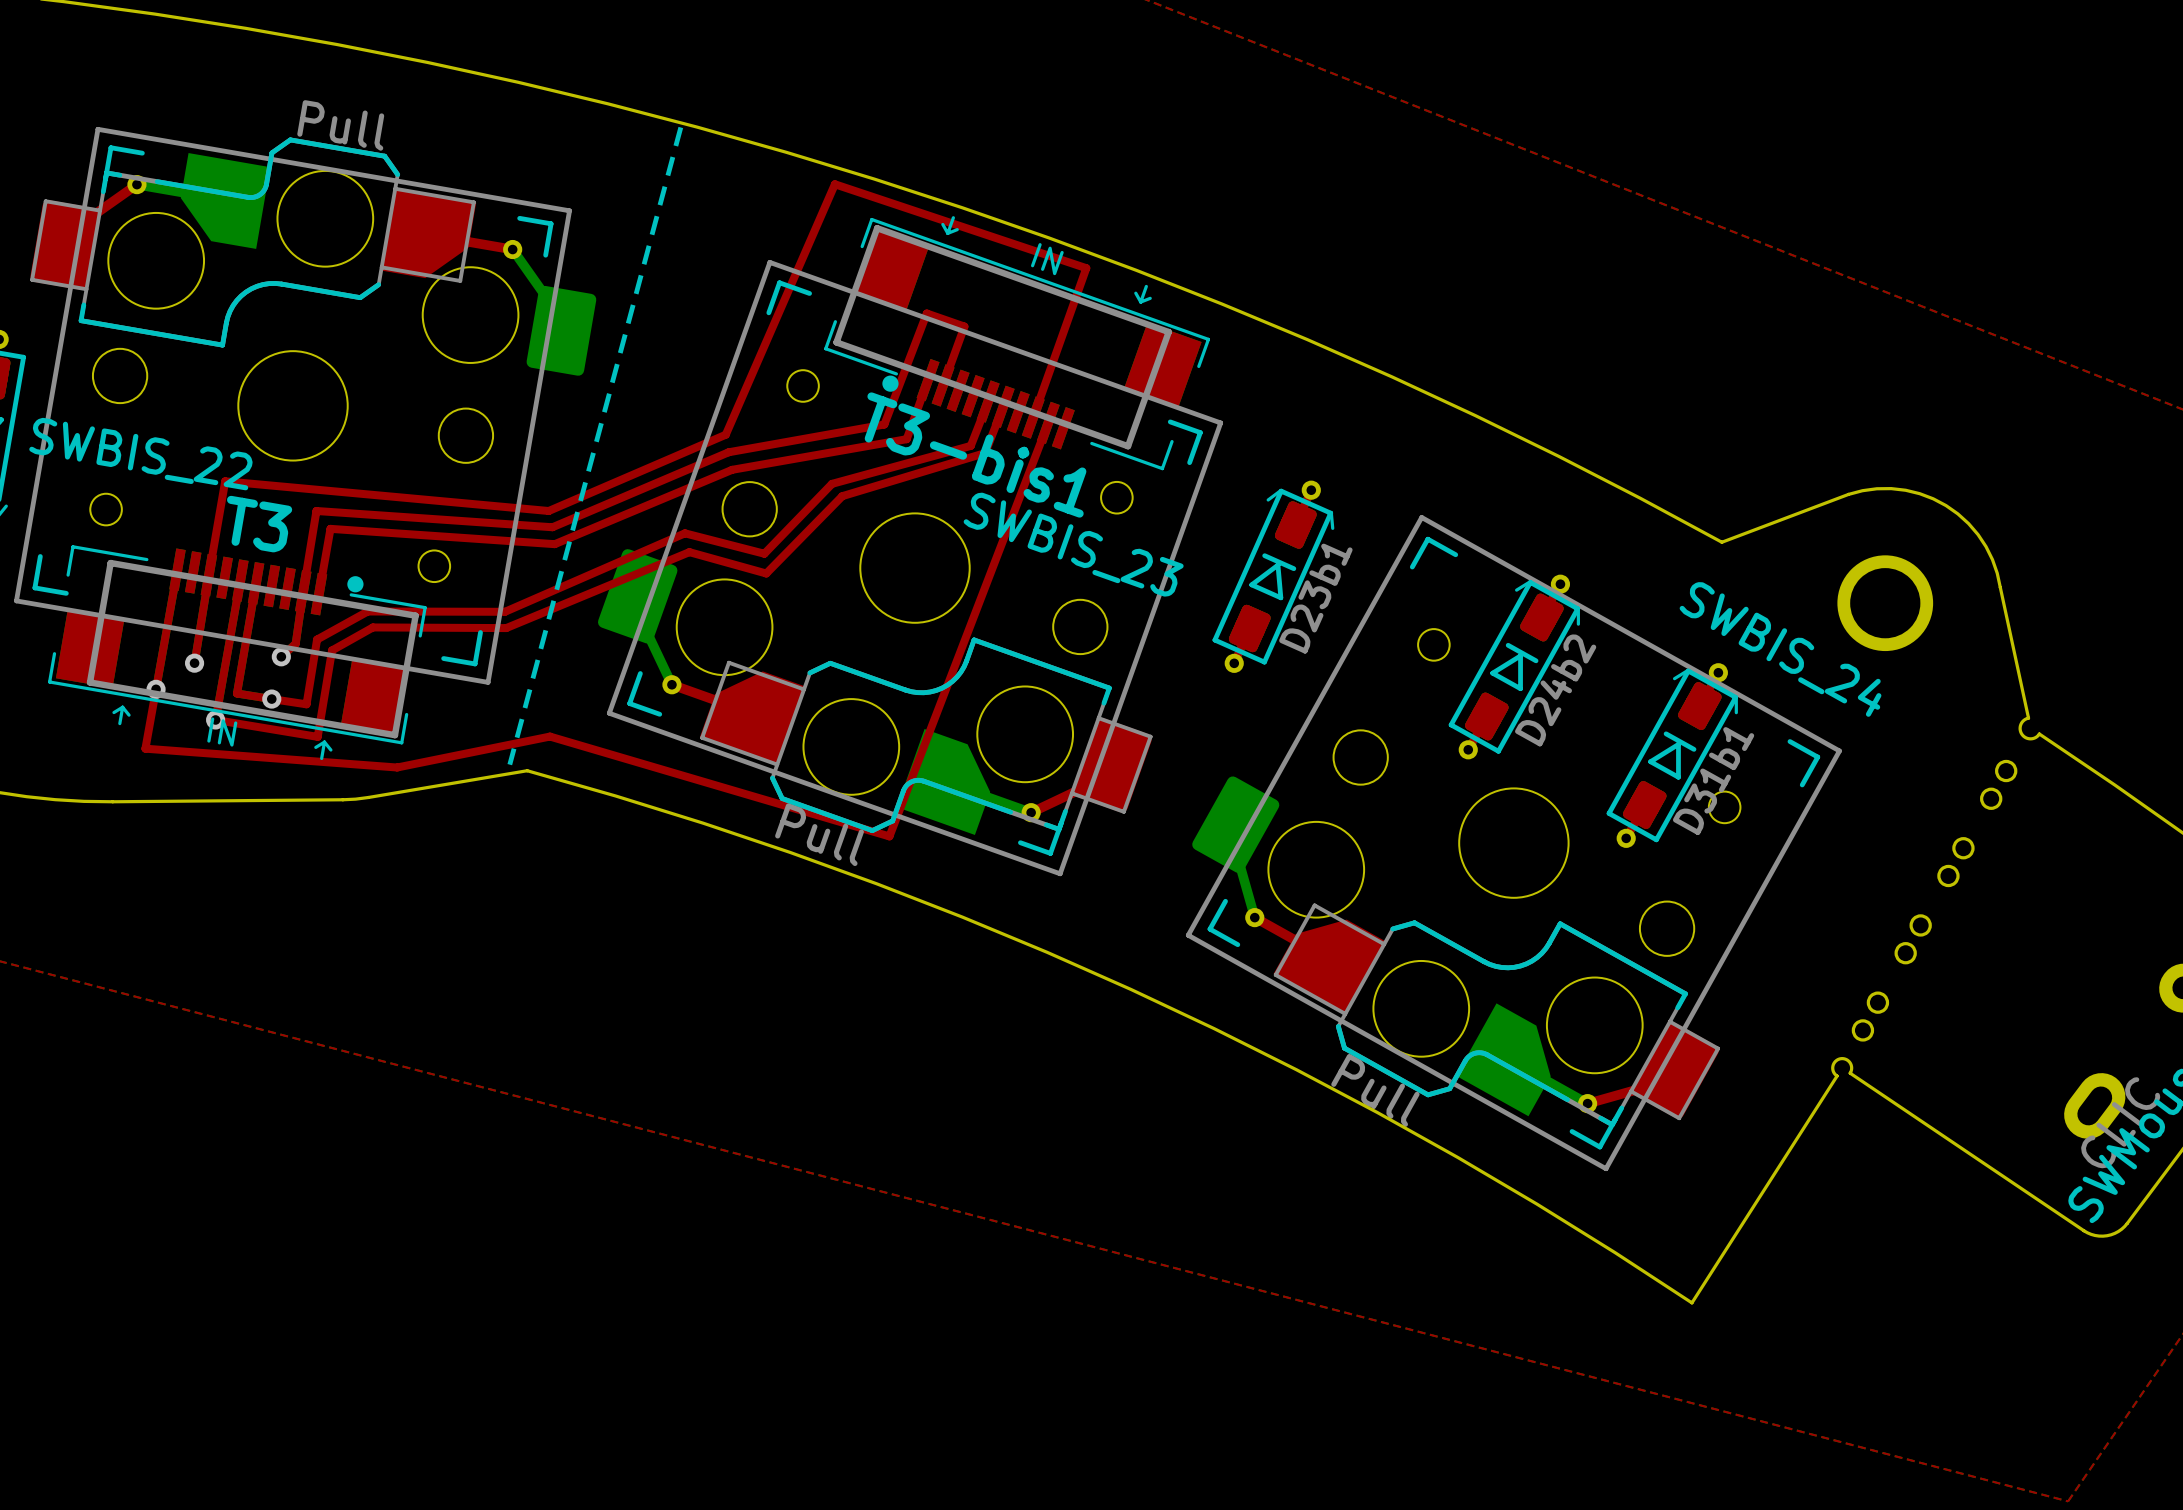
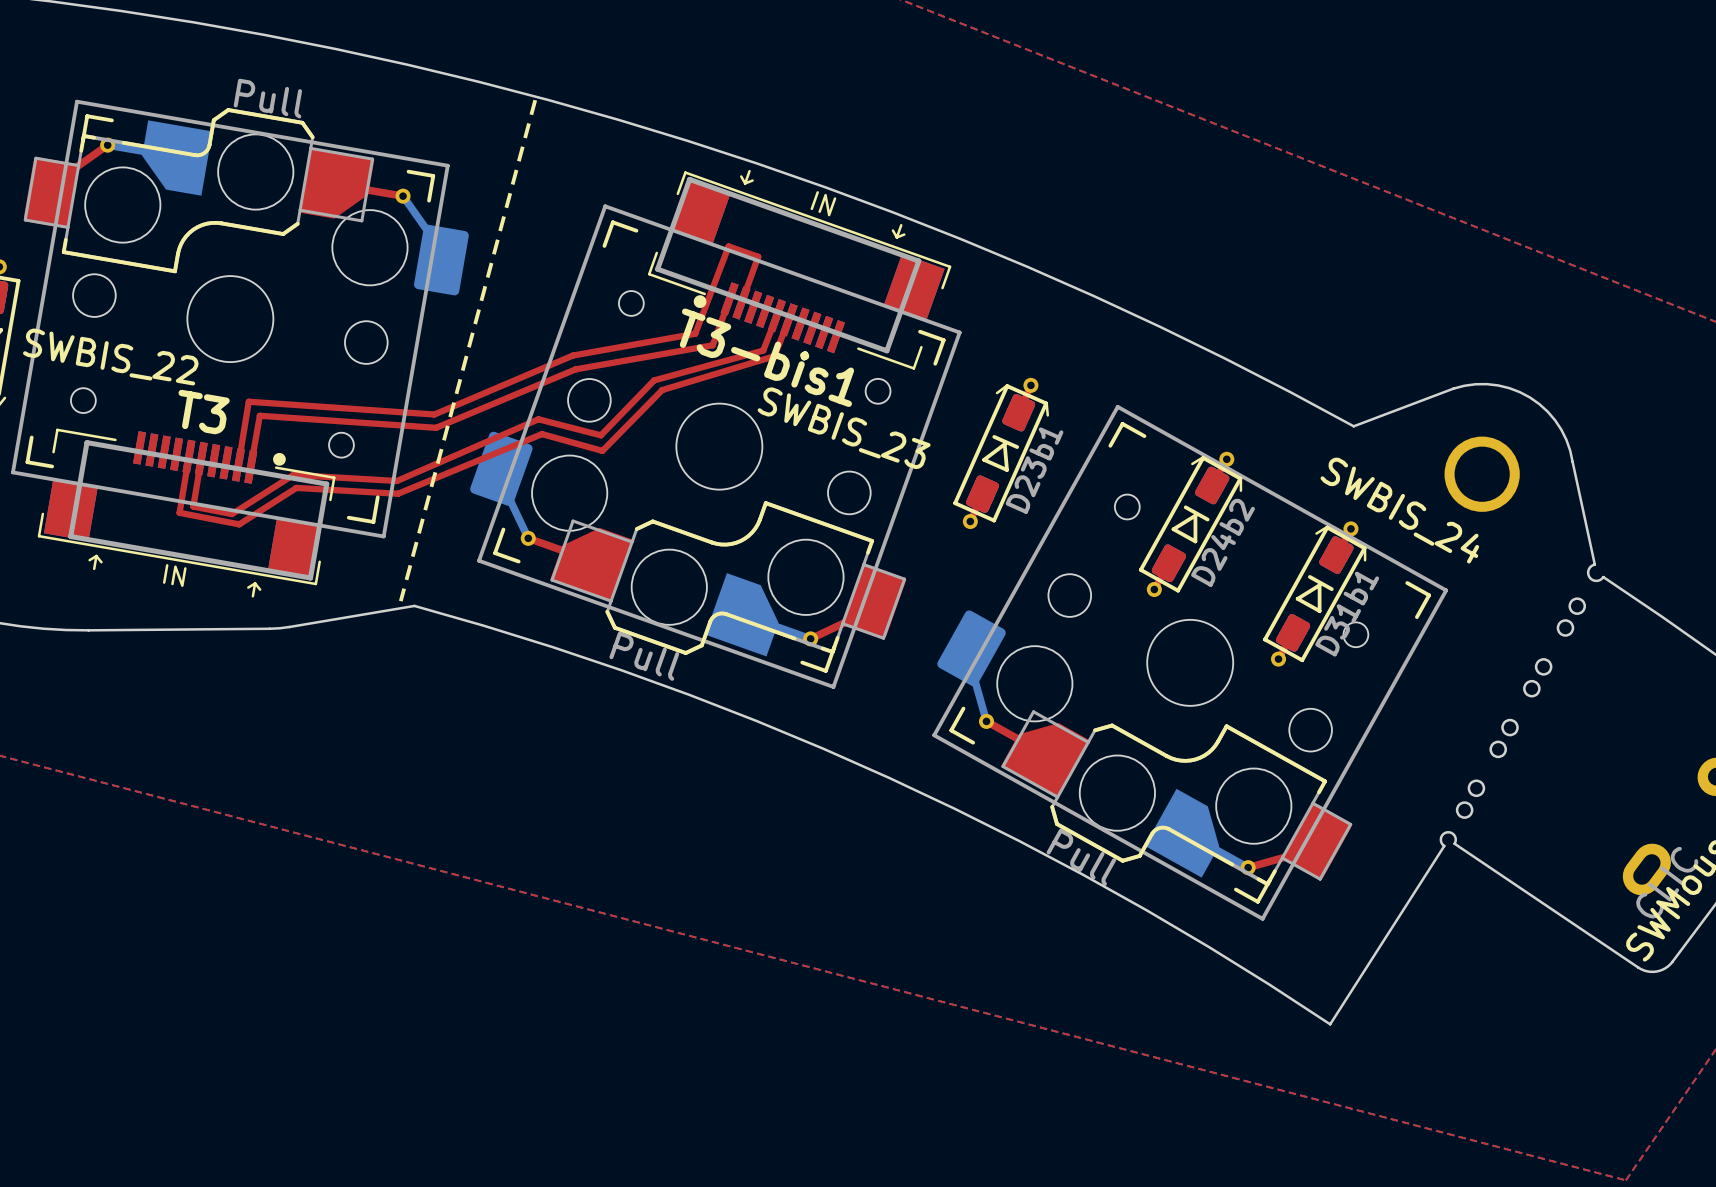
top track: (1033, 417) (1086, 268) (834, 184) (725, 434) (548, 511) (225, 481) (194, 663) -> none
top track: (1048, 422) (889, 836) (549, 736) (397, 767) (145, 748) (177, 569) -> none
top track: (240, 580) (215, 719) (317, 736) (332, 650) (372, 627) (506, 628) -> (188, 456) (179, 512) (239, 524) (296, 487) (398, 493)
top track: (256, 583) (236, 693) (306, 704) (317, 639) (367, 611) (505, 611) -> (201, 458) (193, 506) (231, 514) (293, 474) (397, 480)
top track: (303, 591) (295, 643) (281, 656) -> none
via: (281, 656) -> none
via: (194, 663) -> none
via: (156, 689) -> none
via: (271, 699) -> none
via: (215, 719) -> none

